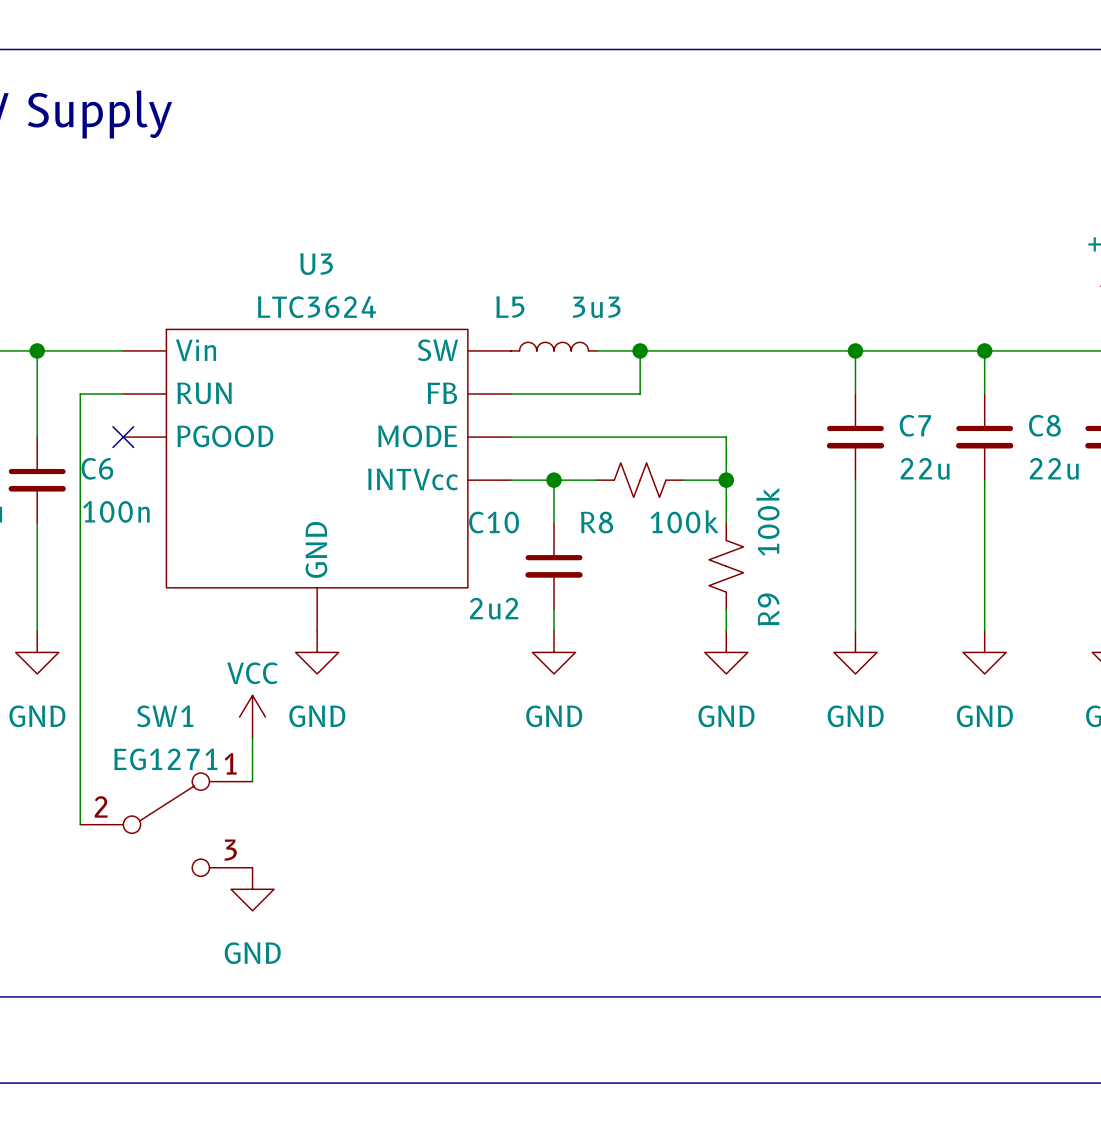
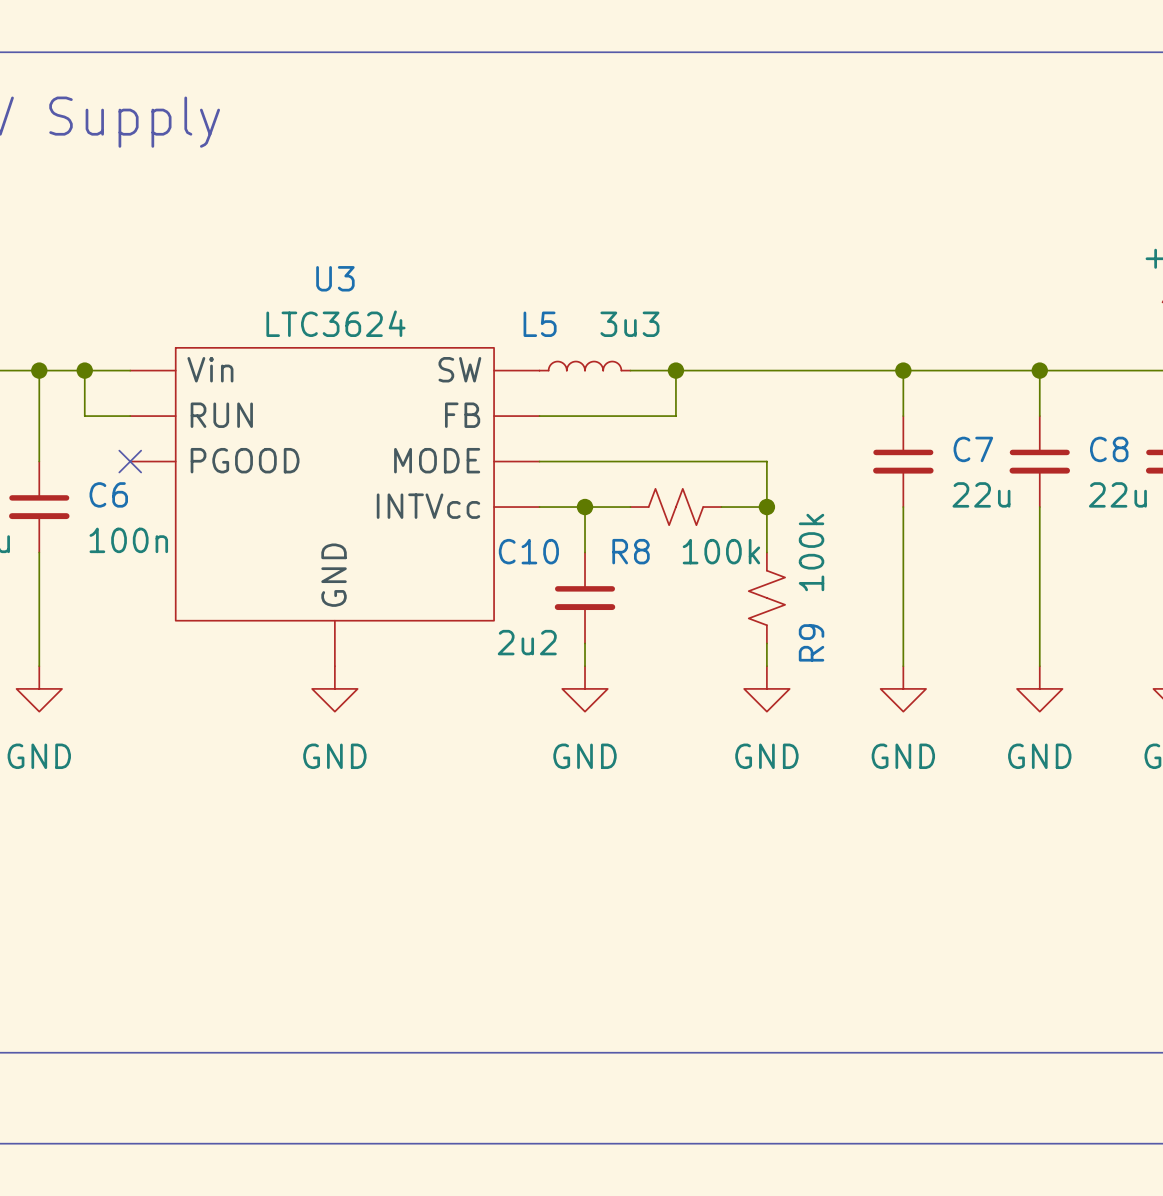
junction: none -> (84, 370)
wire: (80, 394) (80, 824) -> (84, 416) (84, 370)
power symbol: VCC (252, 717) -> none
wire: (252, 738) (252, 781) -> none
SW1: EG1271 (166, 824) -> none
power symbol: GND (252, 889) -> none

